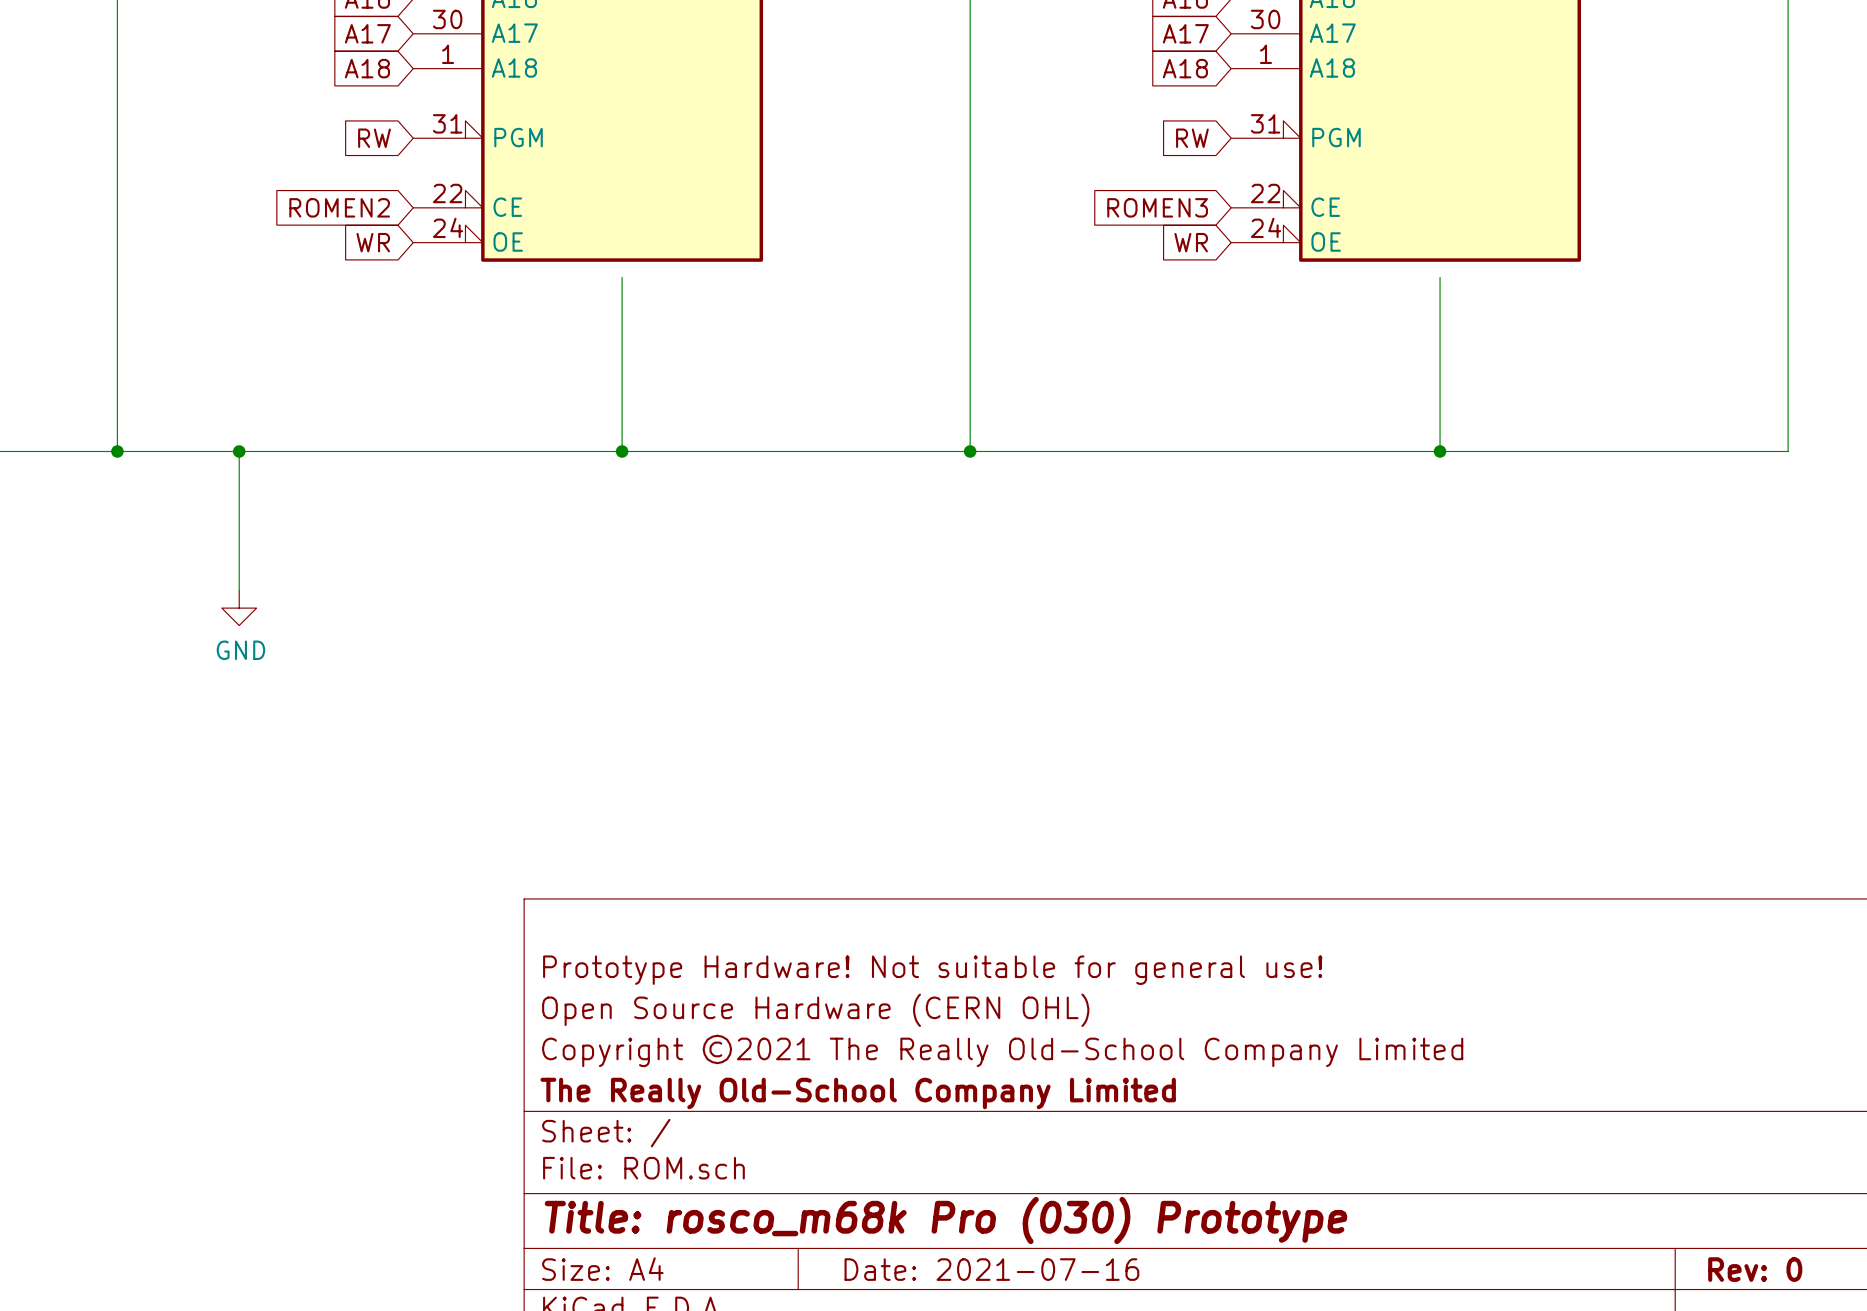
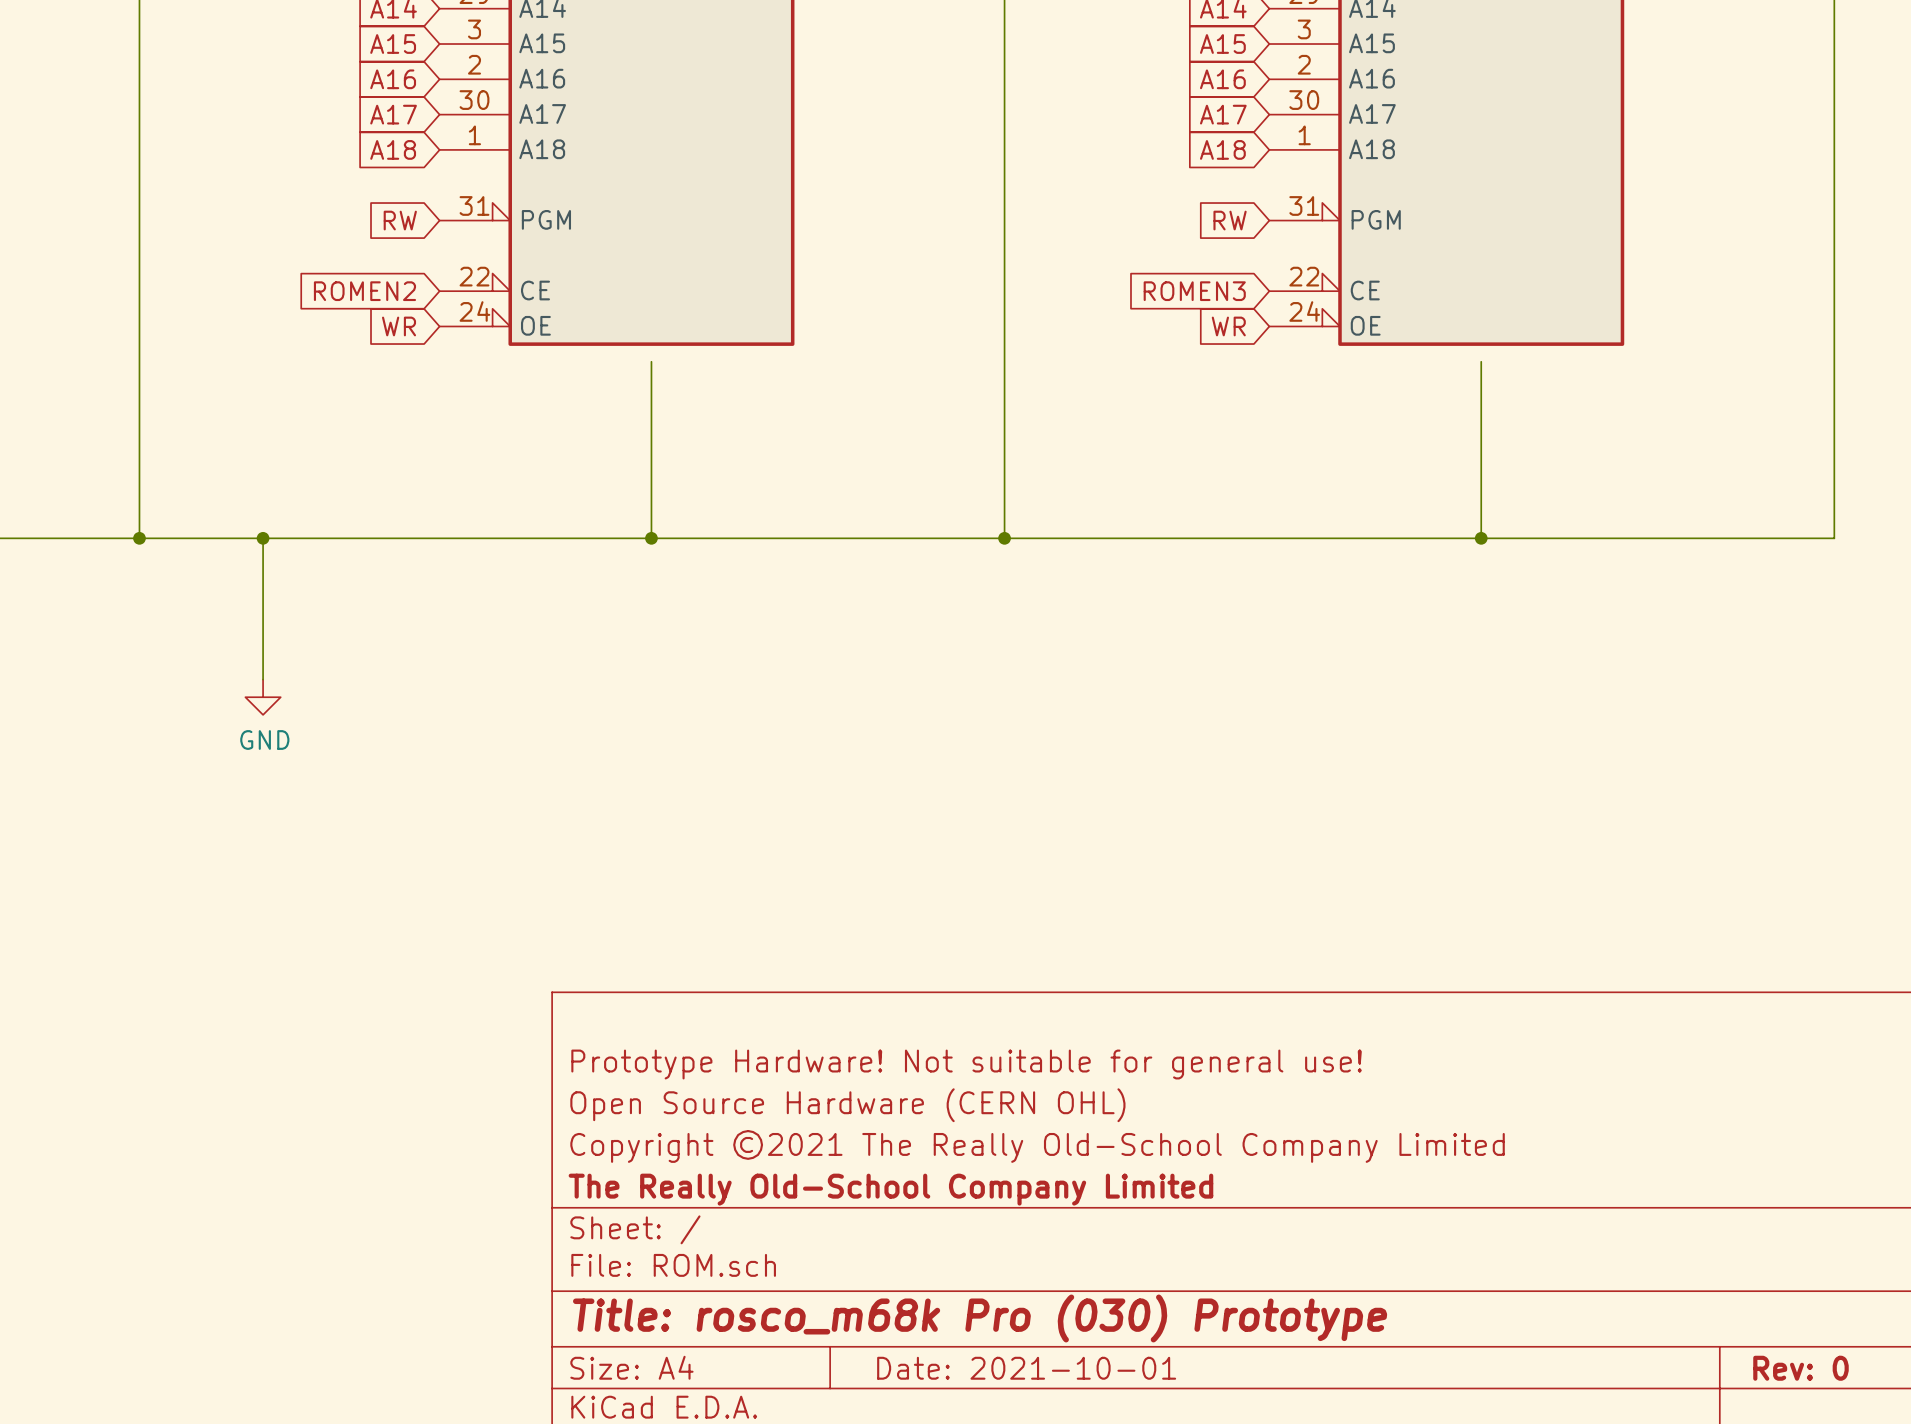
title block: Date: 2021-07-16 (991, 1269) -> Date: 2021-10-01 (1026, 1368)

